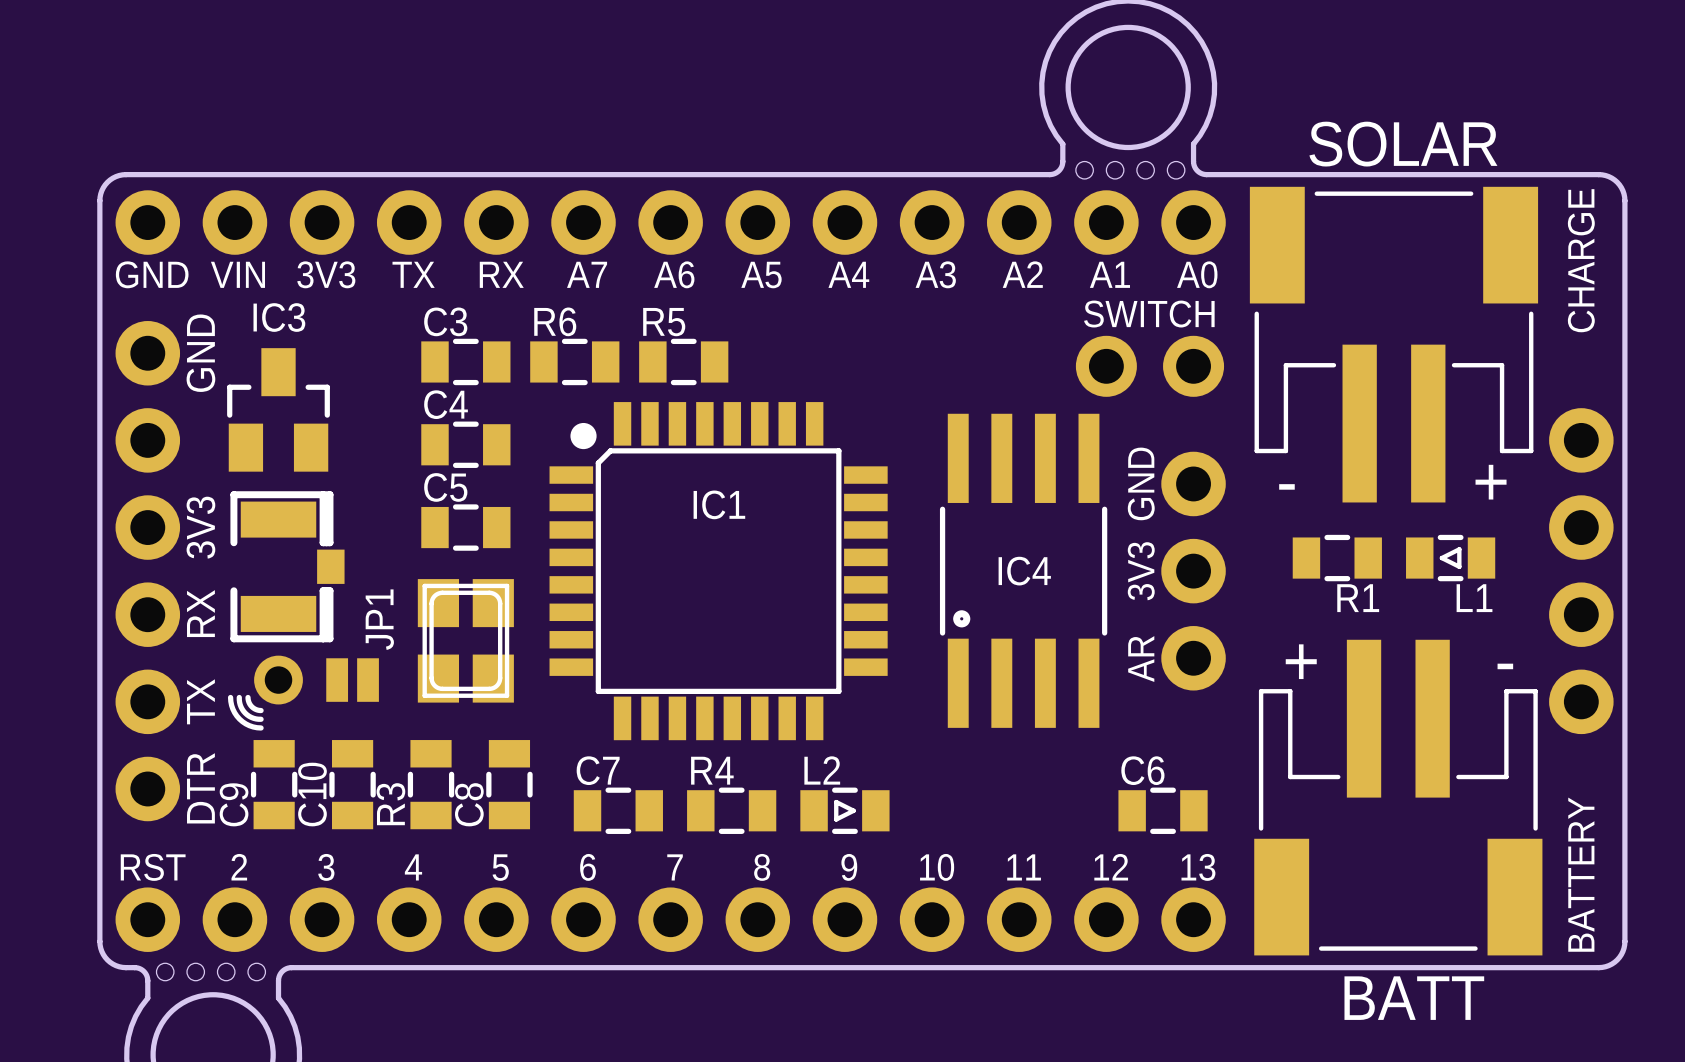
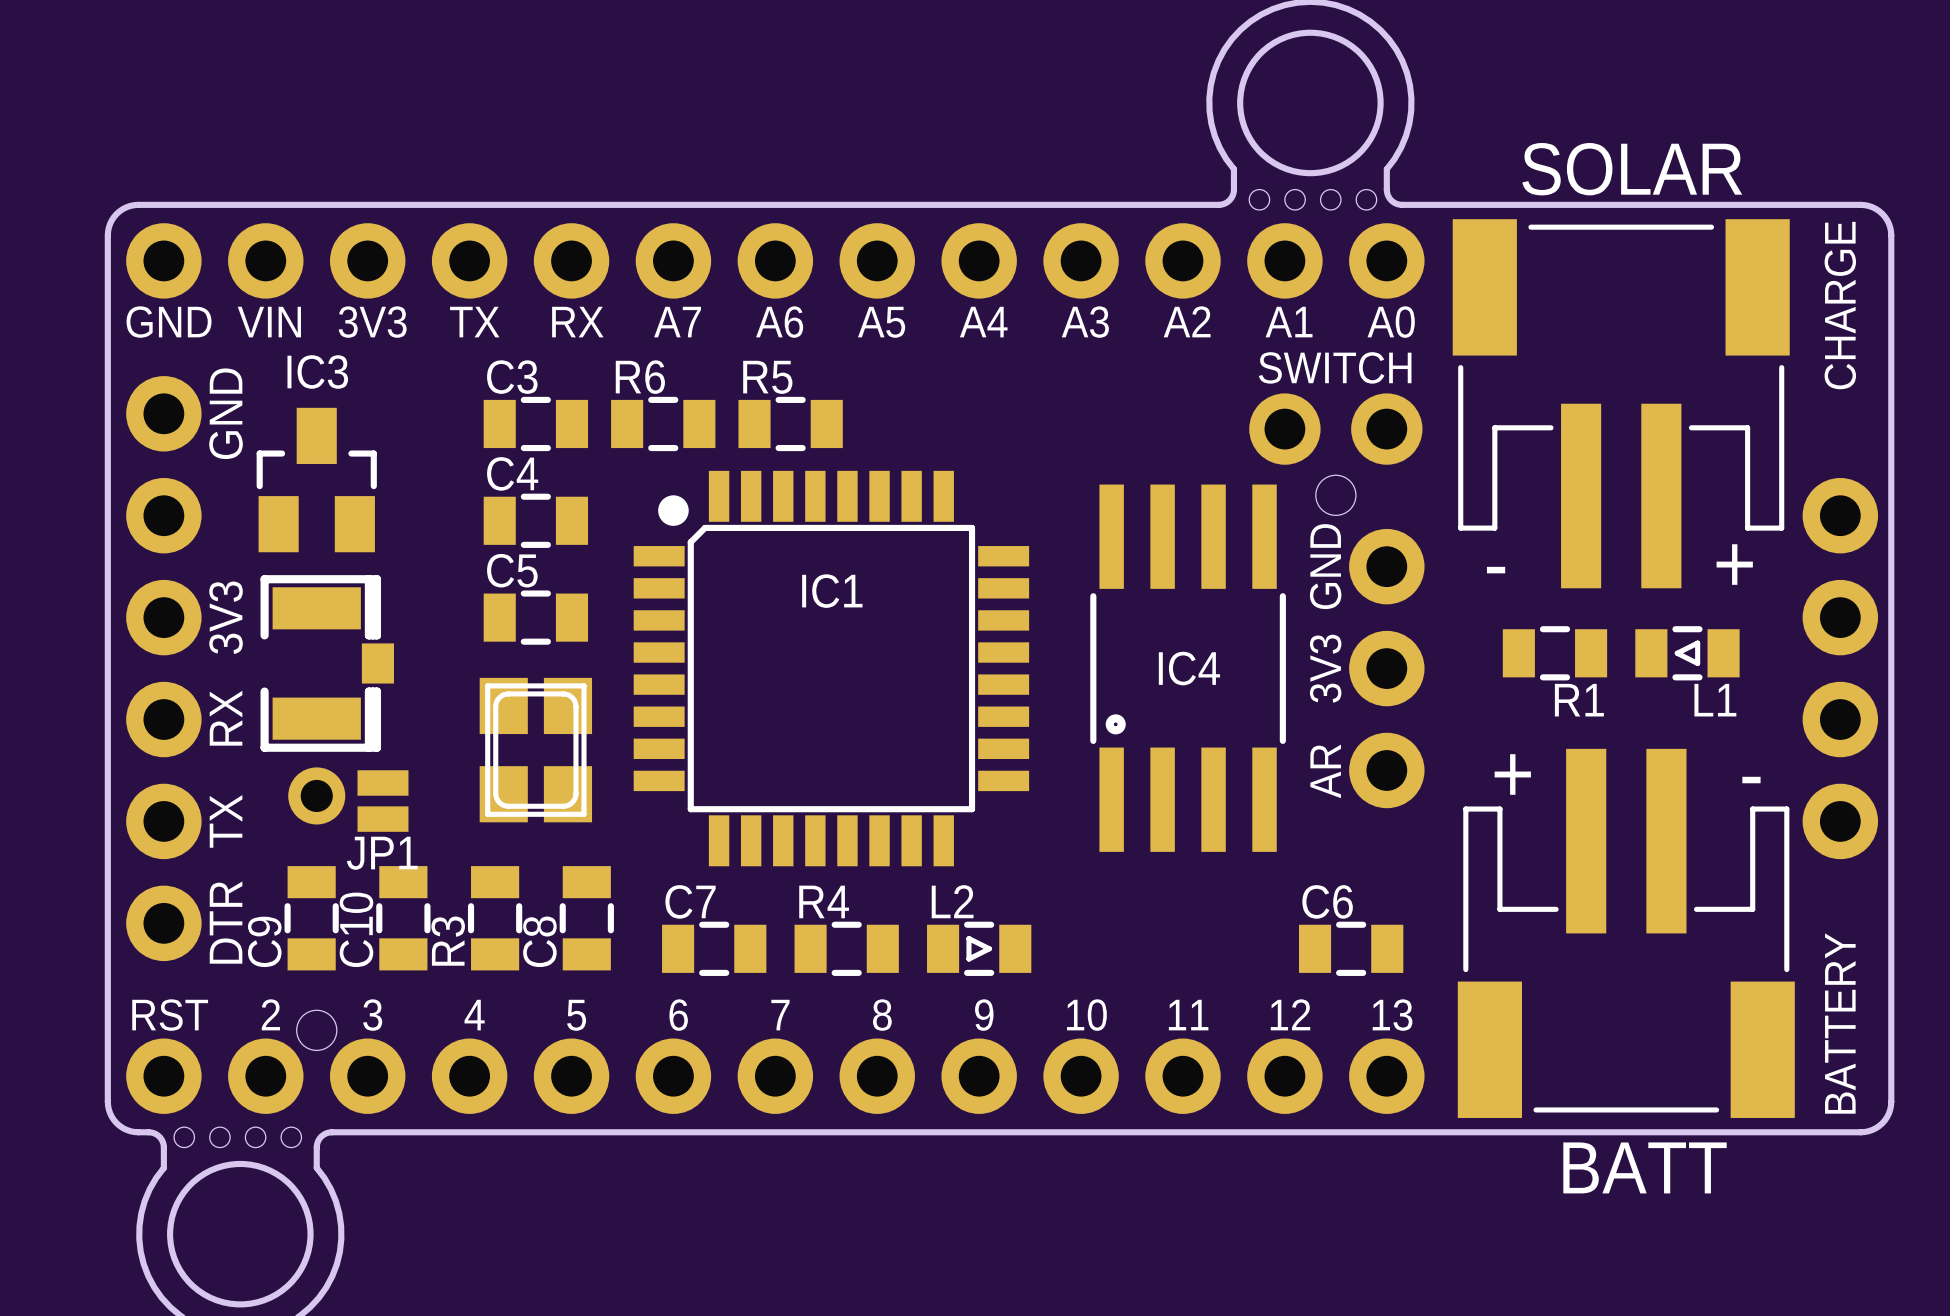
round board edge: none -> [1315, 474, 1357, 516]
text rotation: 0° (379, 619) -> 90° clockwise (382, 853)
text position: JP1 (379, 619) -> JP1 (382, 853)
part rotation: 0° (352, 680) -> 90° clockwise (382, 801)
line: (230, 697) (232, 709) (239, 719) (249, 725) (261, 727) -> none
line: (239, 697) (241, 707) (245, 713) (251, 717) (261, 719) -> none
line: (248, 697) (251, 706) (261, 710) -> none
round board edge: none -> [296, 1009, 338, 1051]

